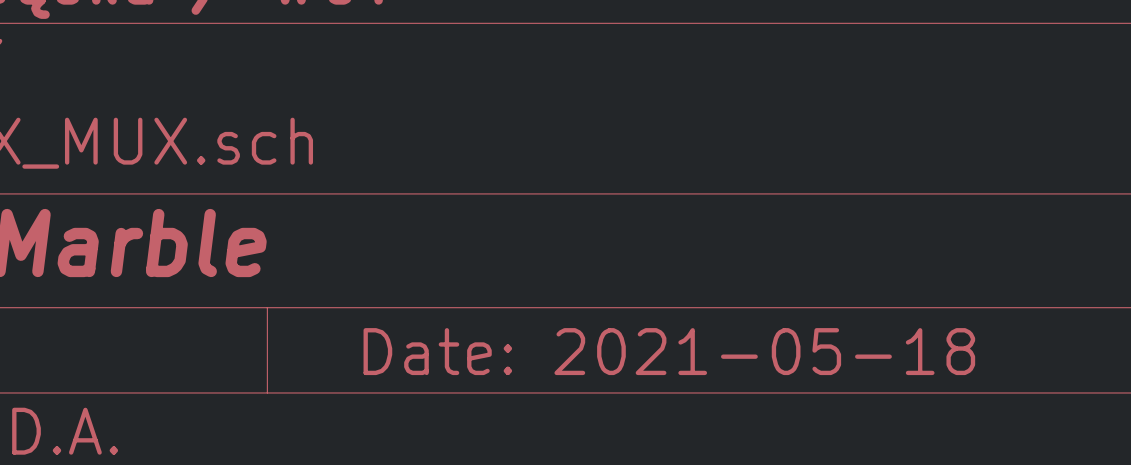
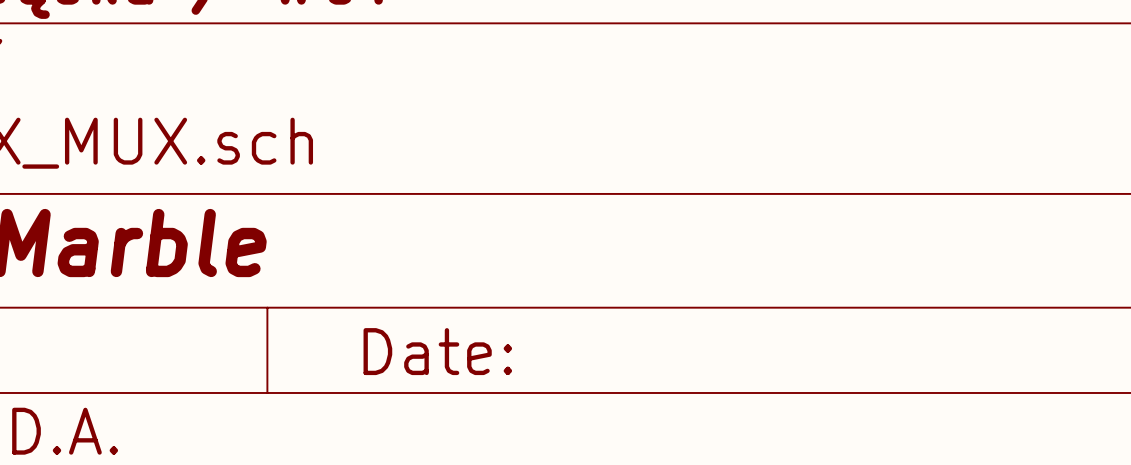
title block: Date: 2021-05-18 (669, 351) -> Date: (437, 351)

